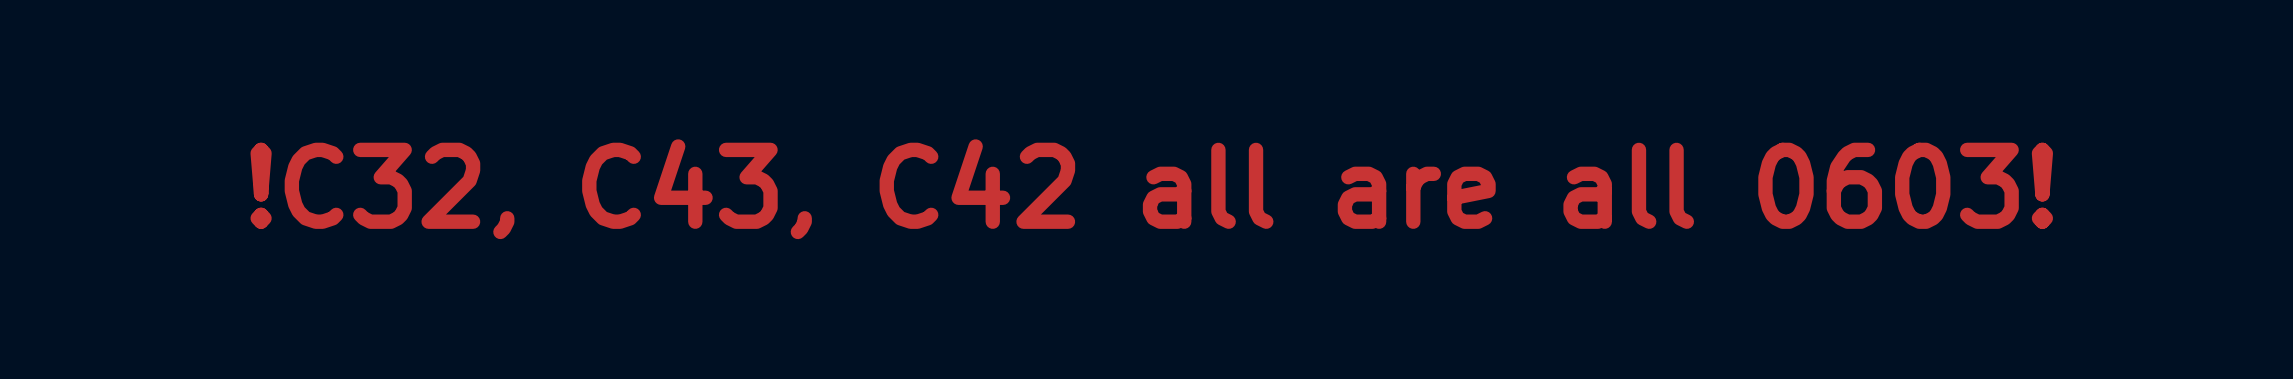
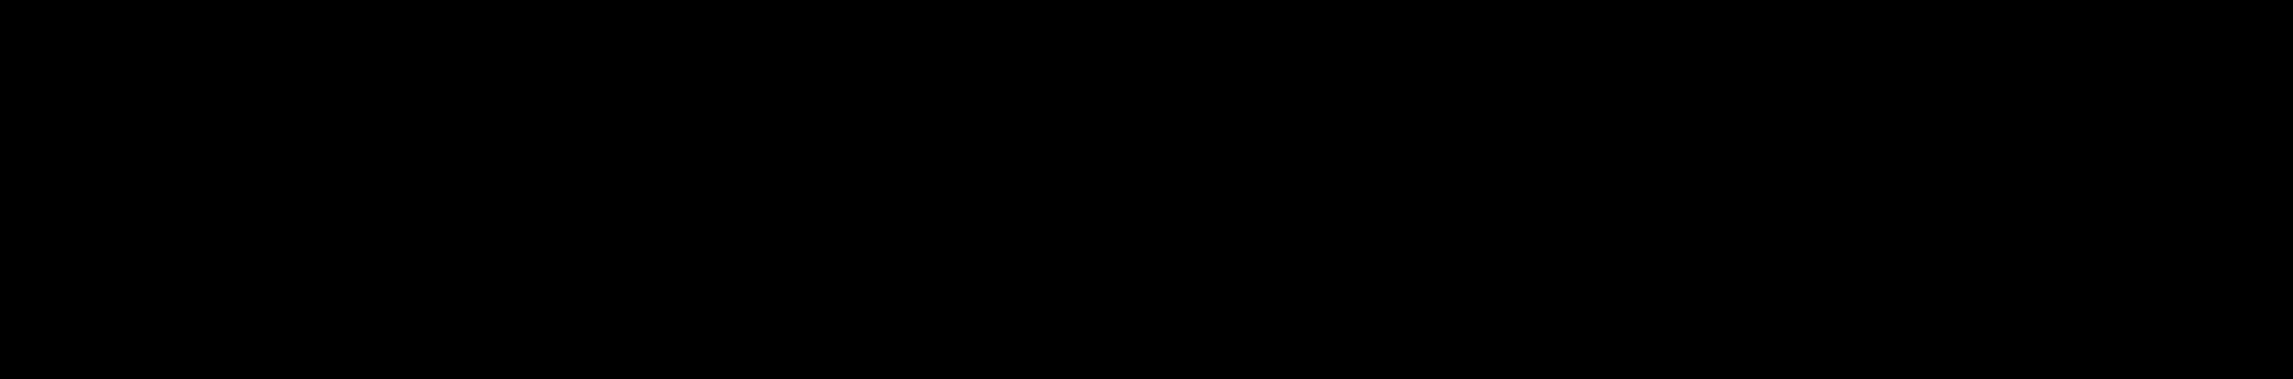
text: !C32, C43, C42 all are all 0603! (1151, 189) -> none

